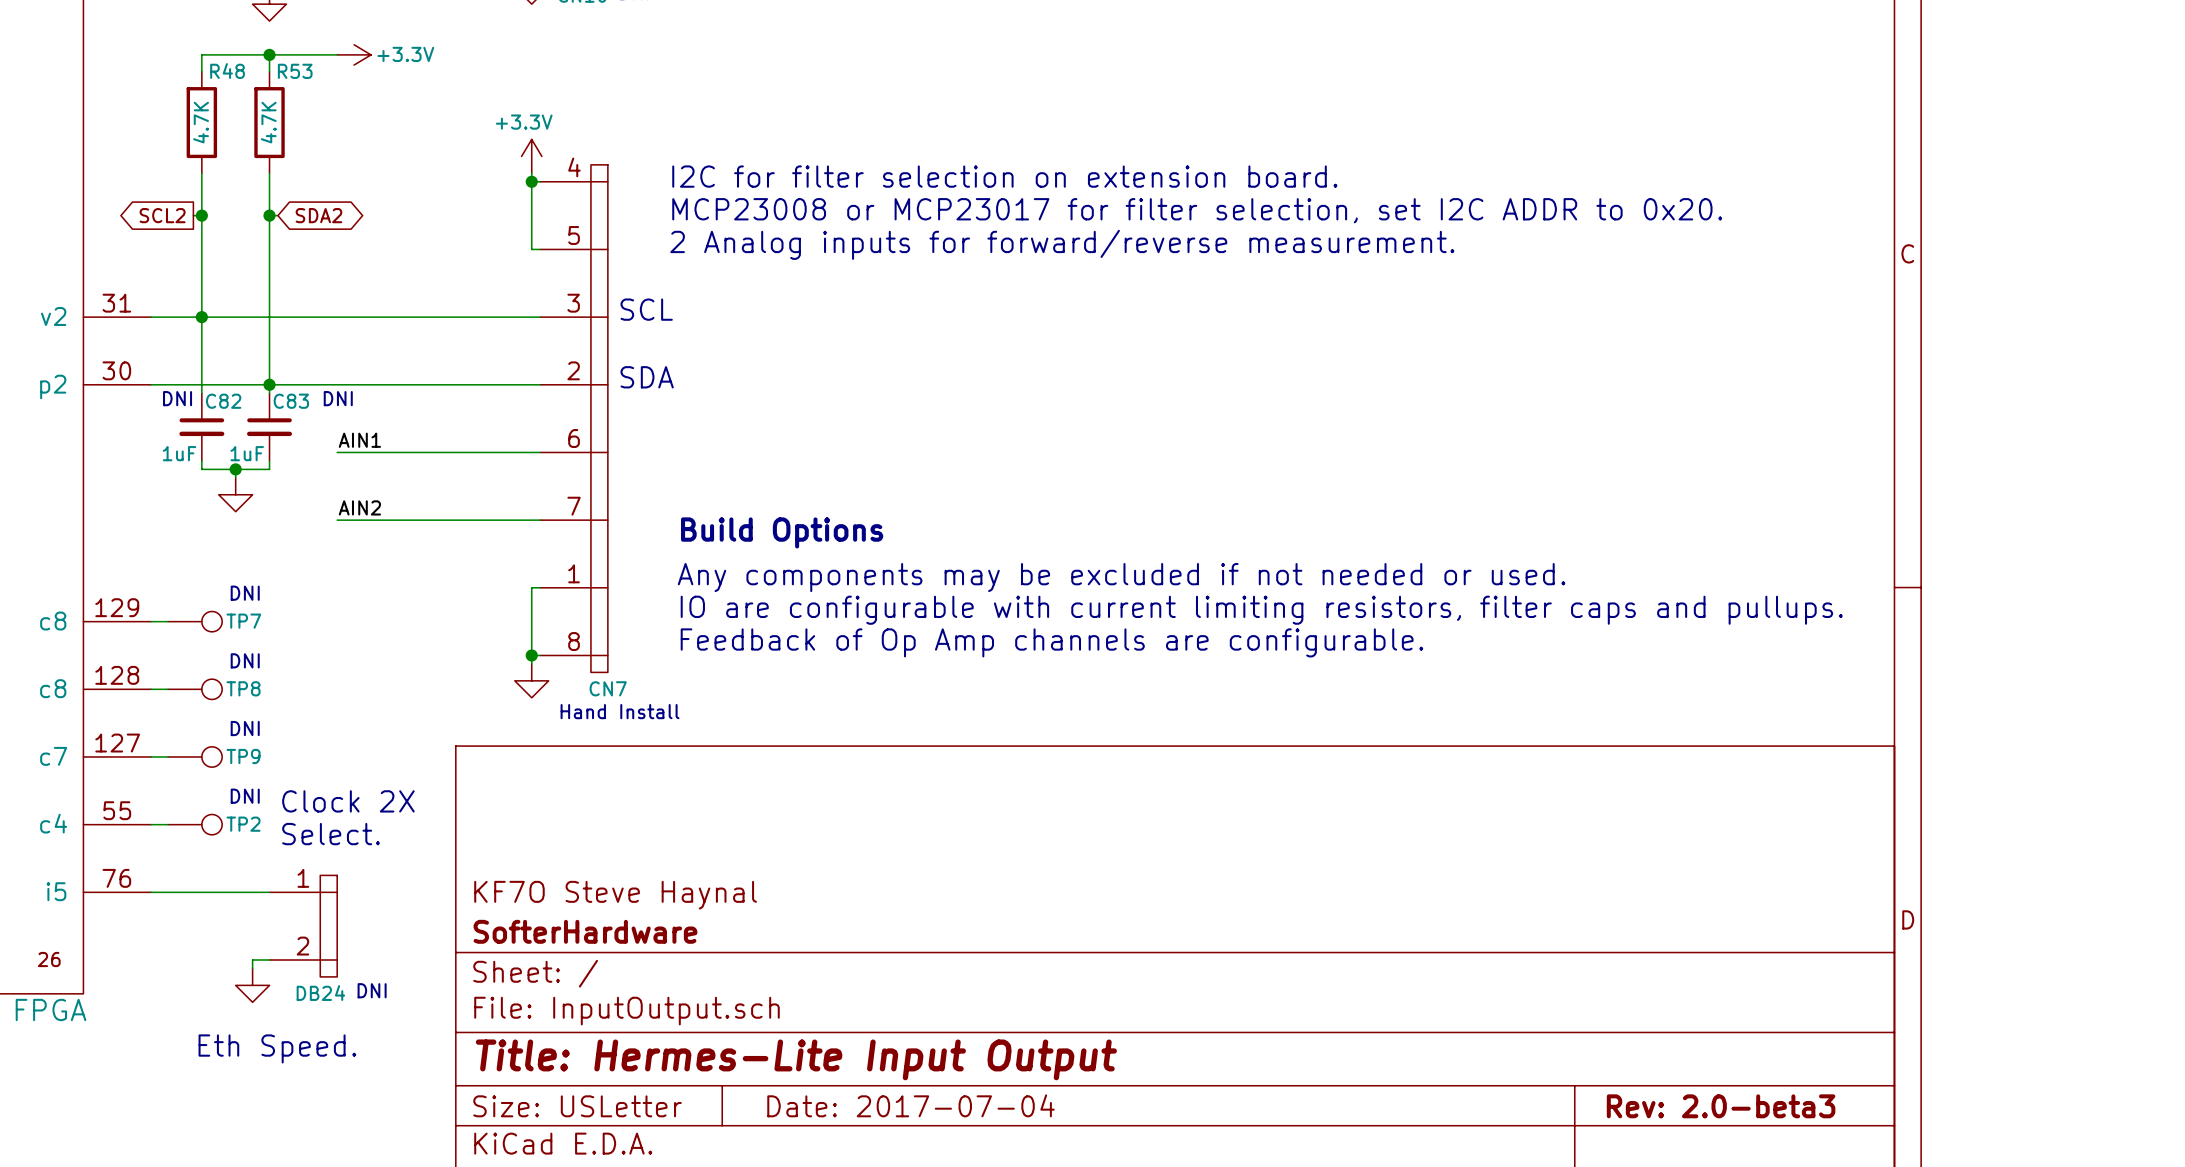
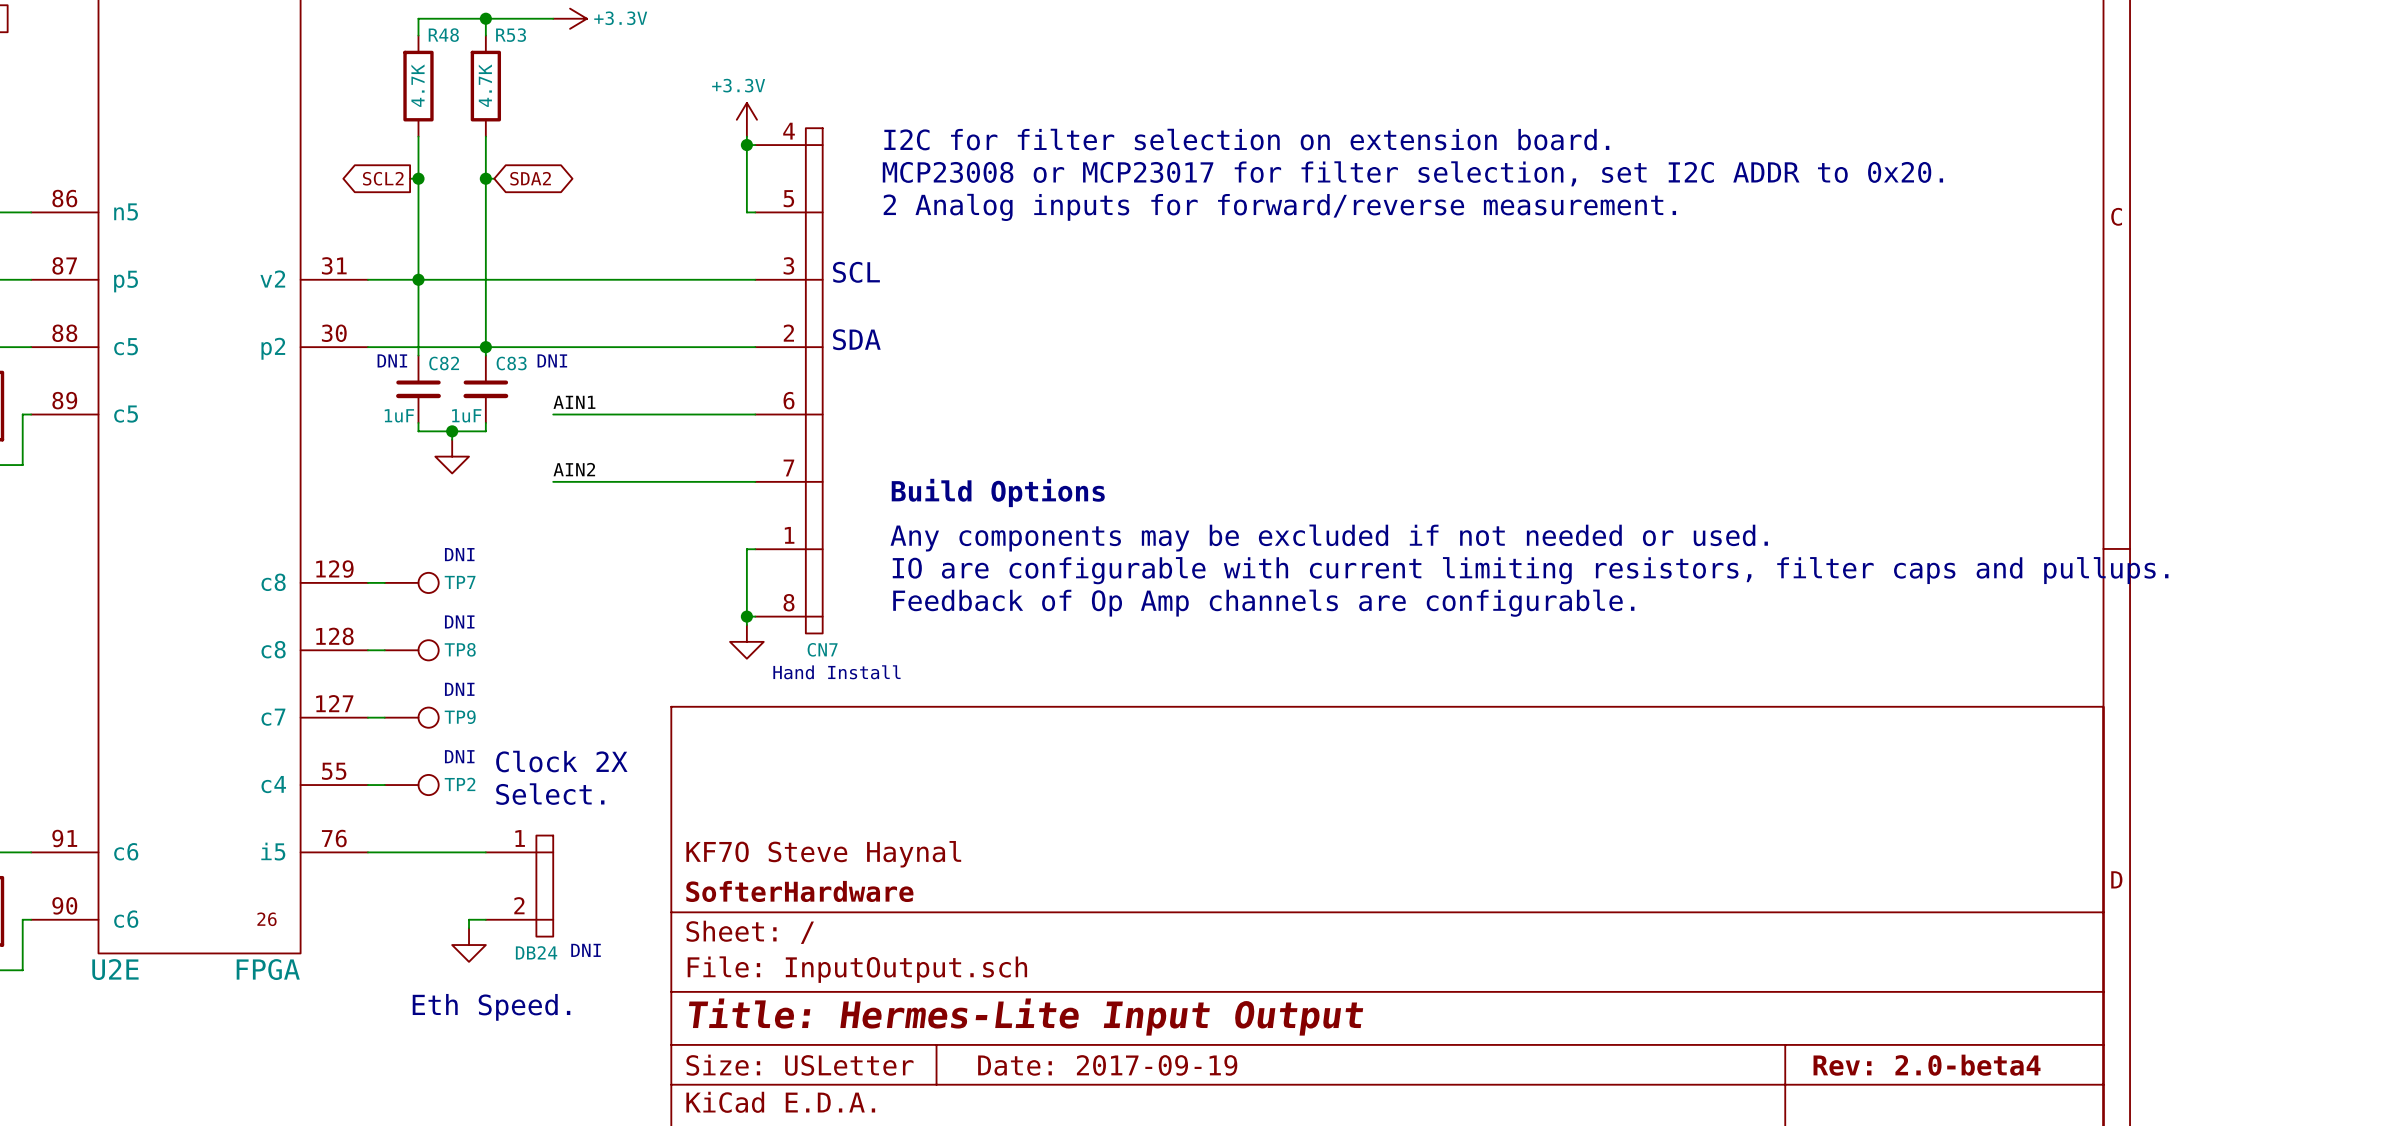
title block: Date: 2017-07-04 (911, 1105) -> Date: 2017-09-19 (1107, 1065)
title block: Rev: 2.0-beta3 (1721, 1106) -> Rev: 2.0-beta4 (1927, 1065)

